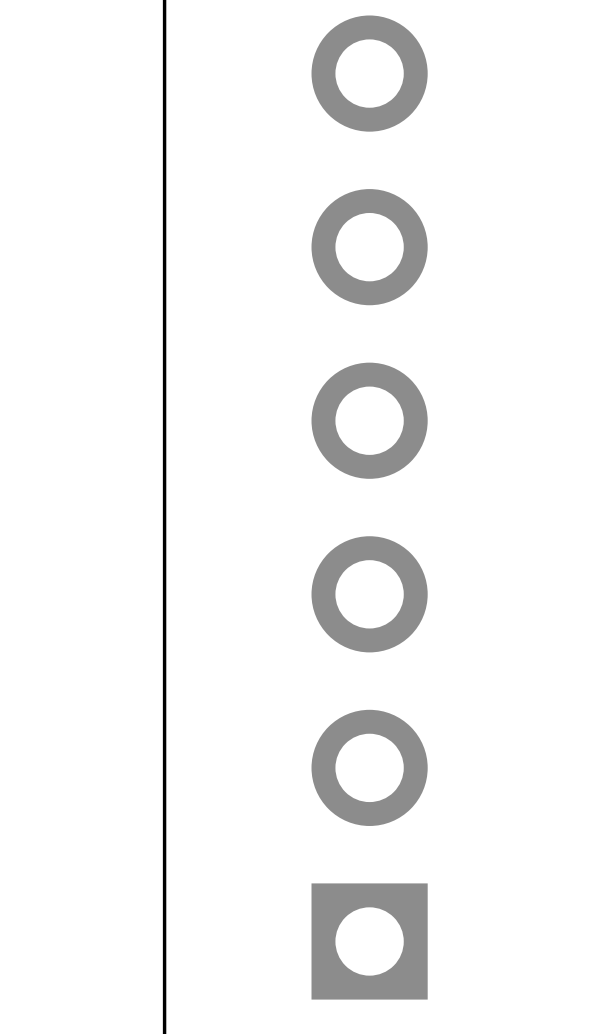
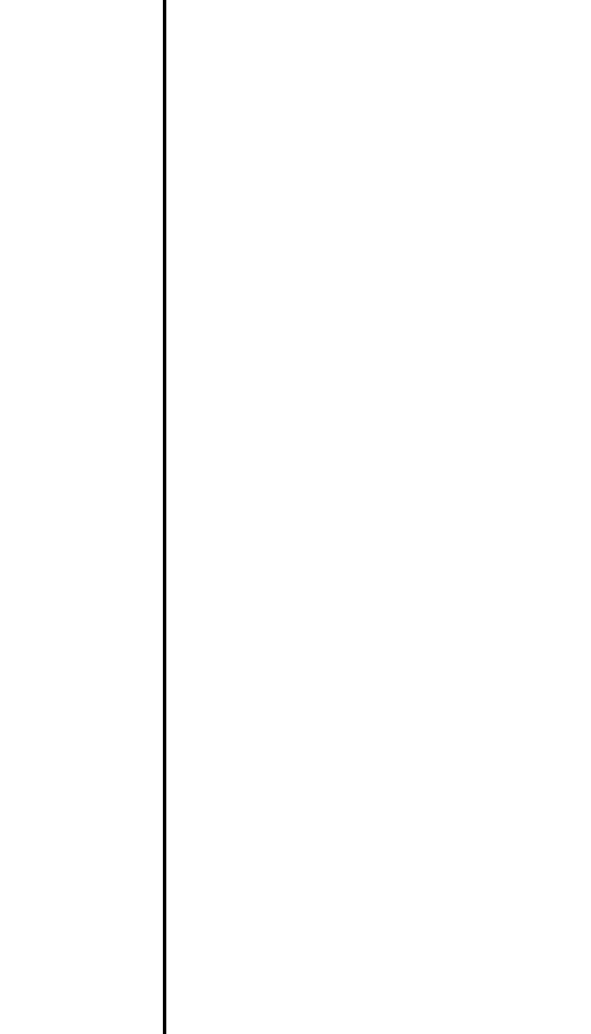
part: (369, 507) -> none

